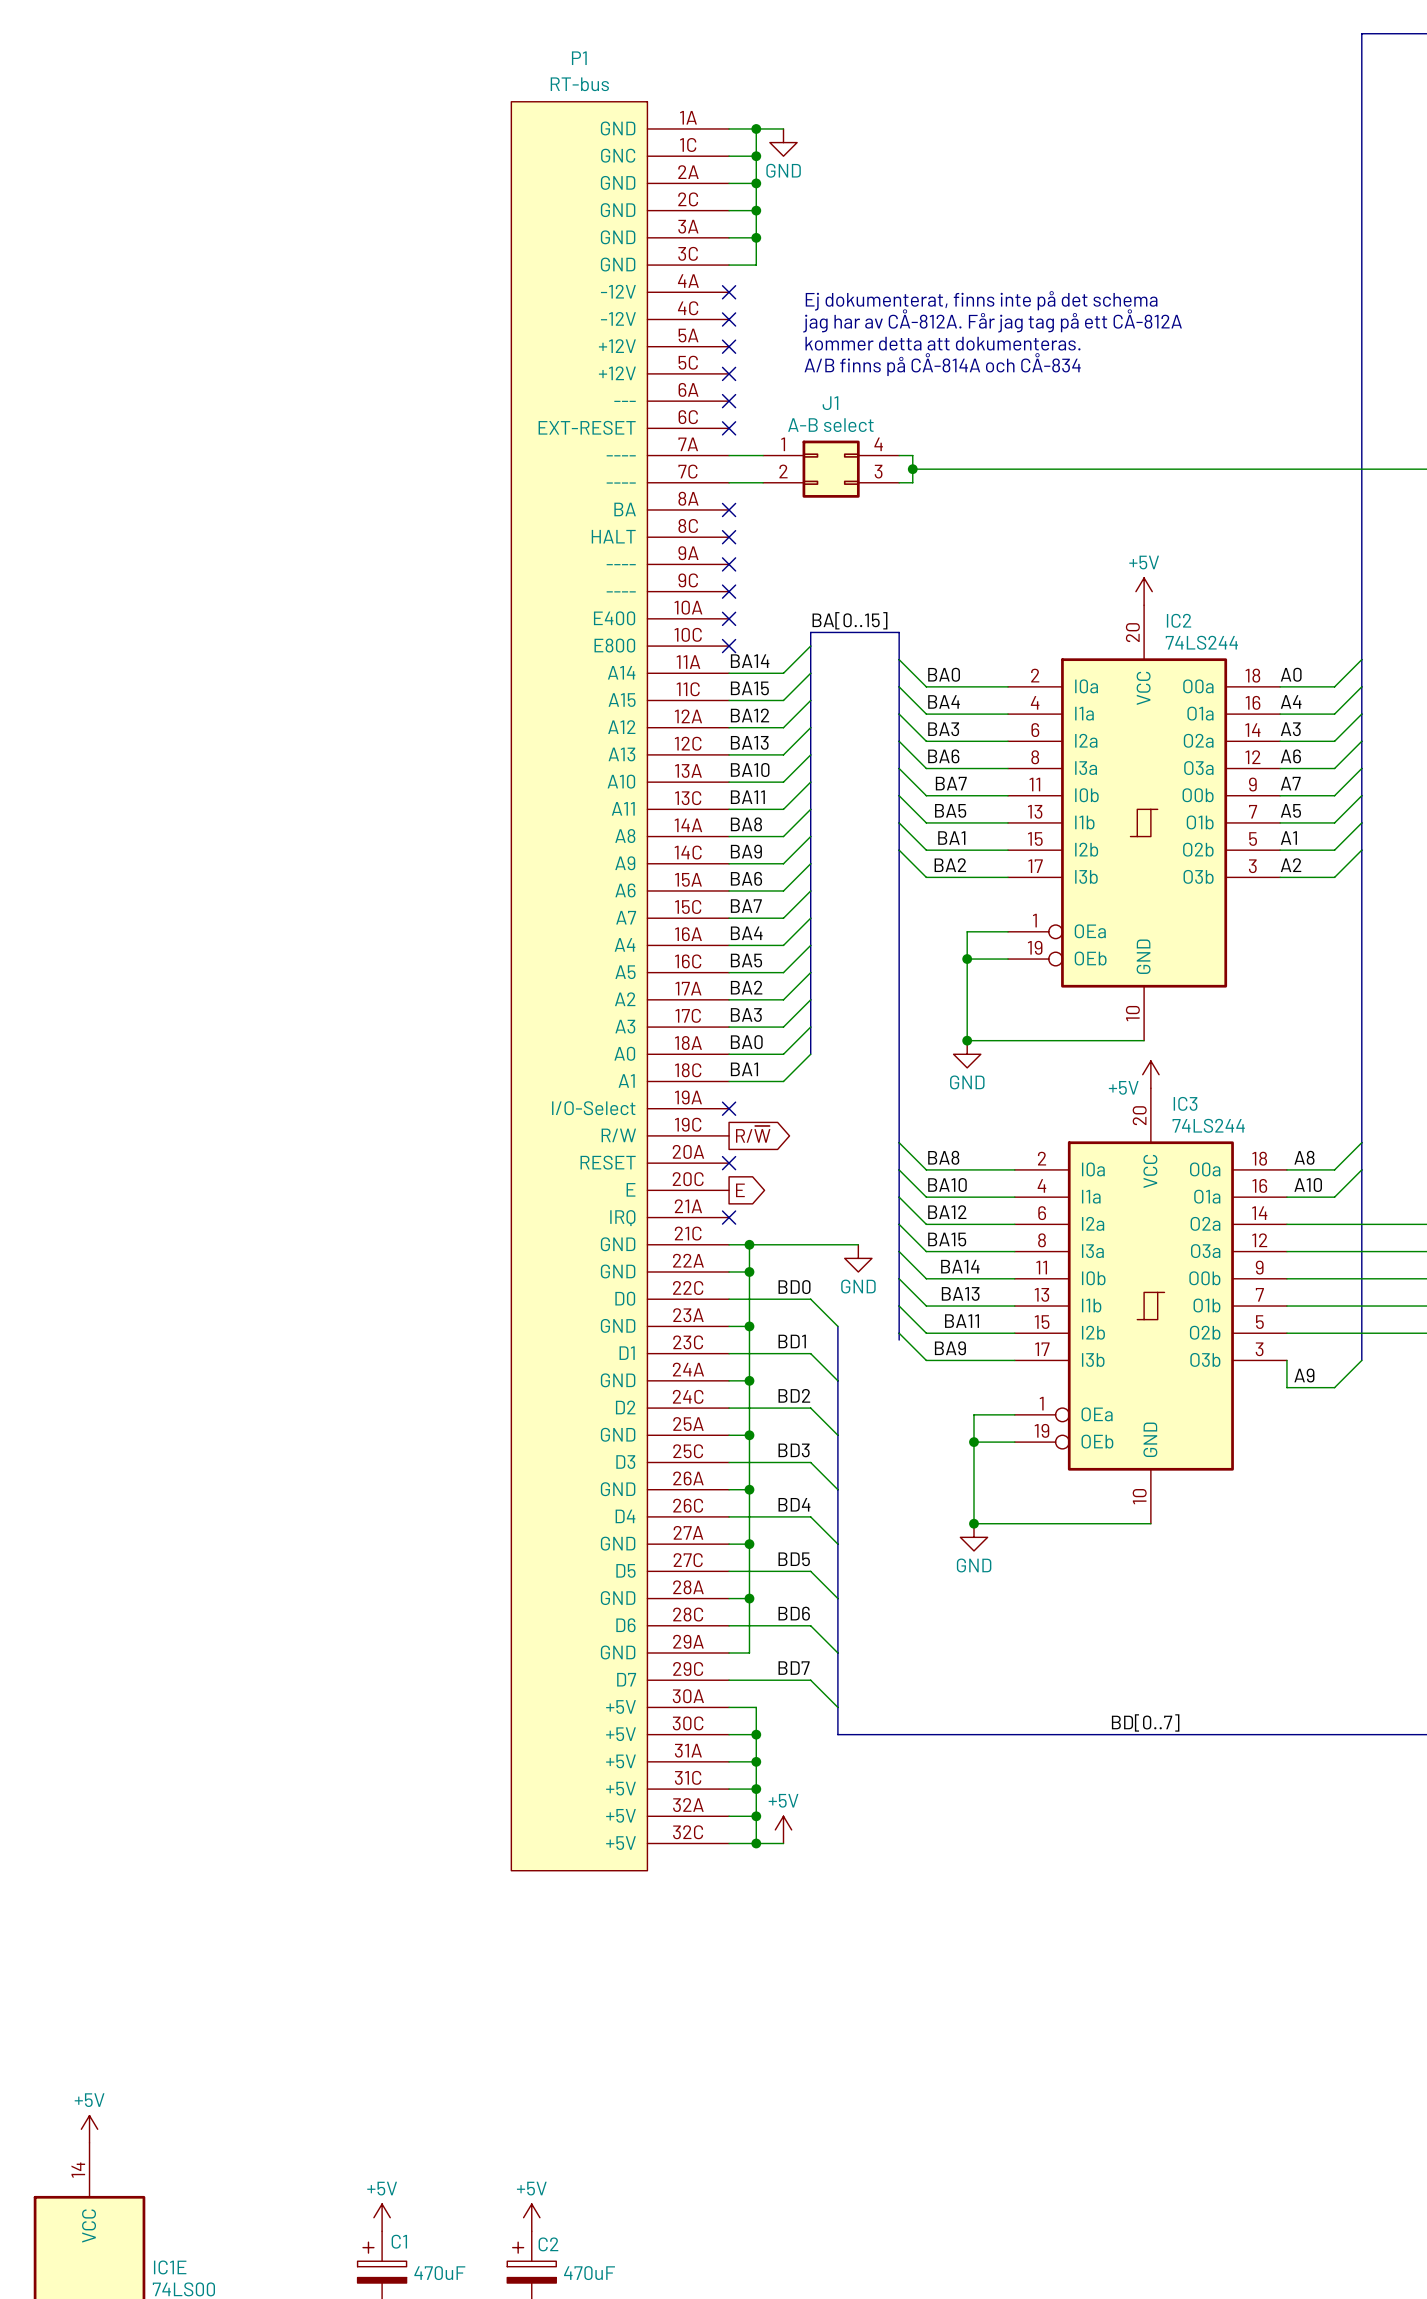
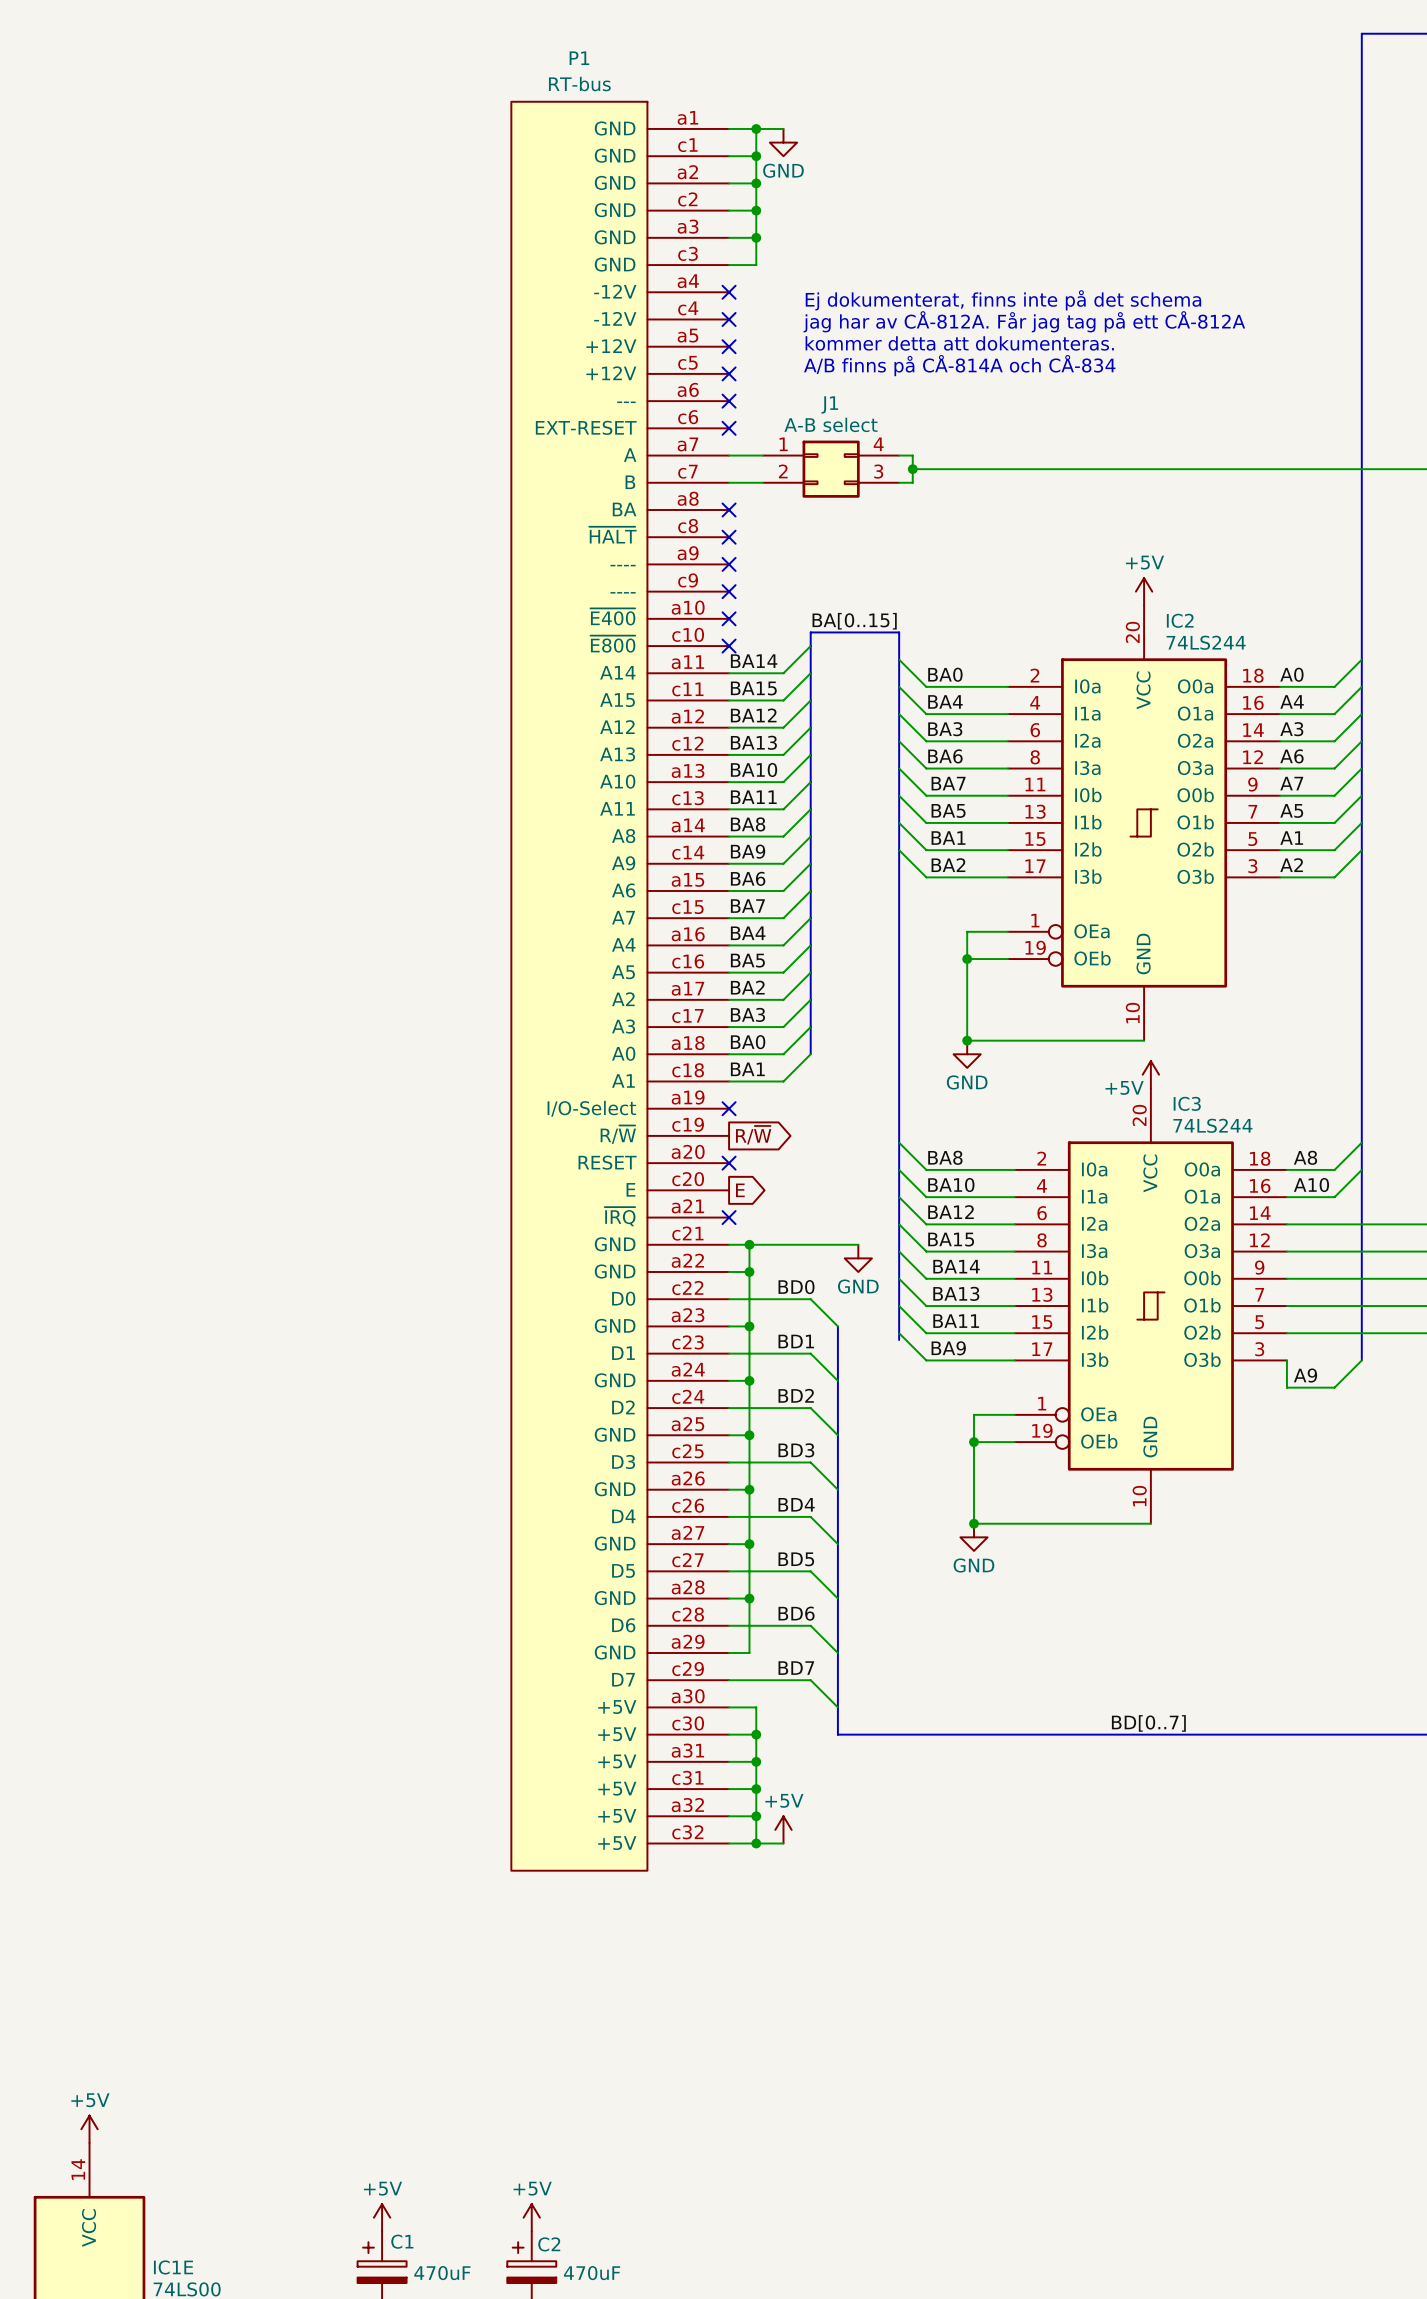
P1 symbol: [511, 101, 730, 1871] -> [511, 101, 730, 1871]

